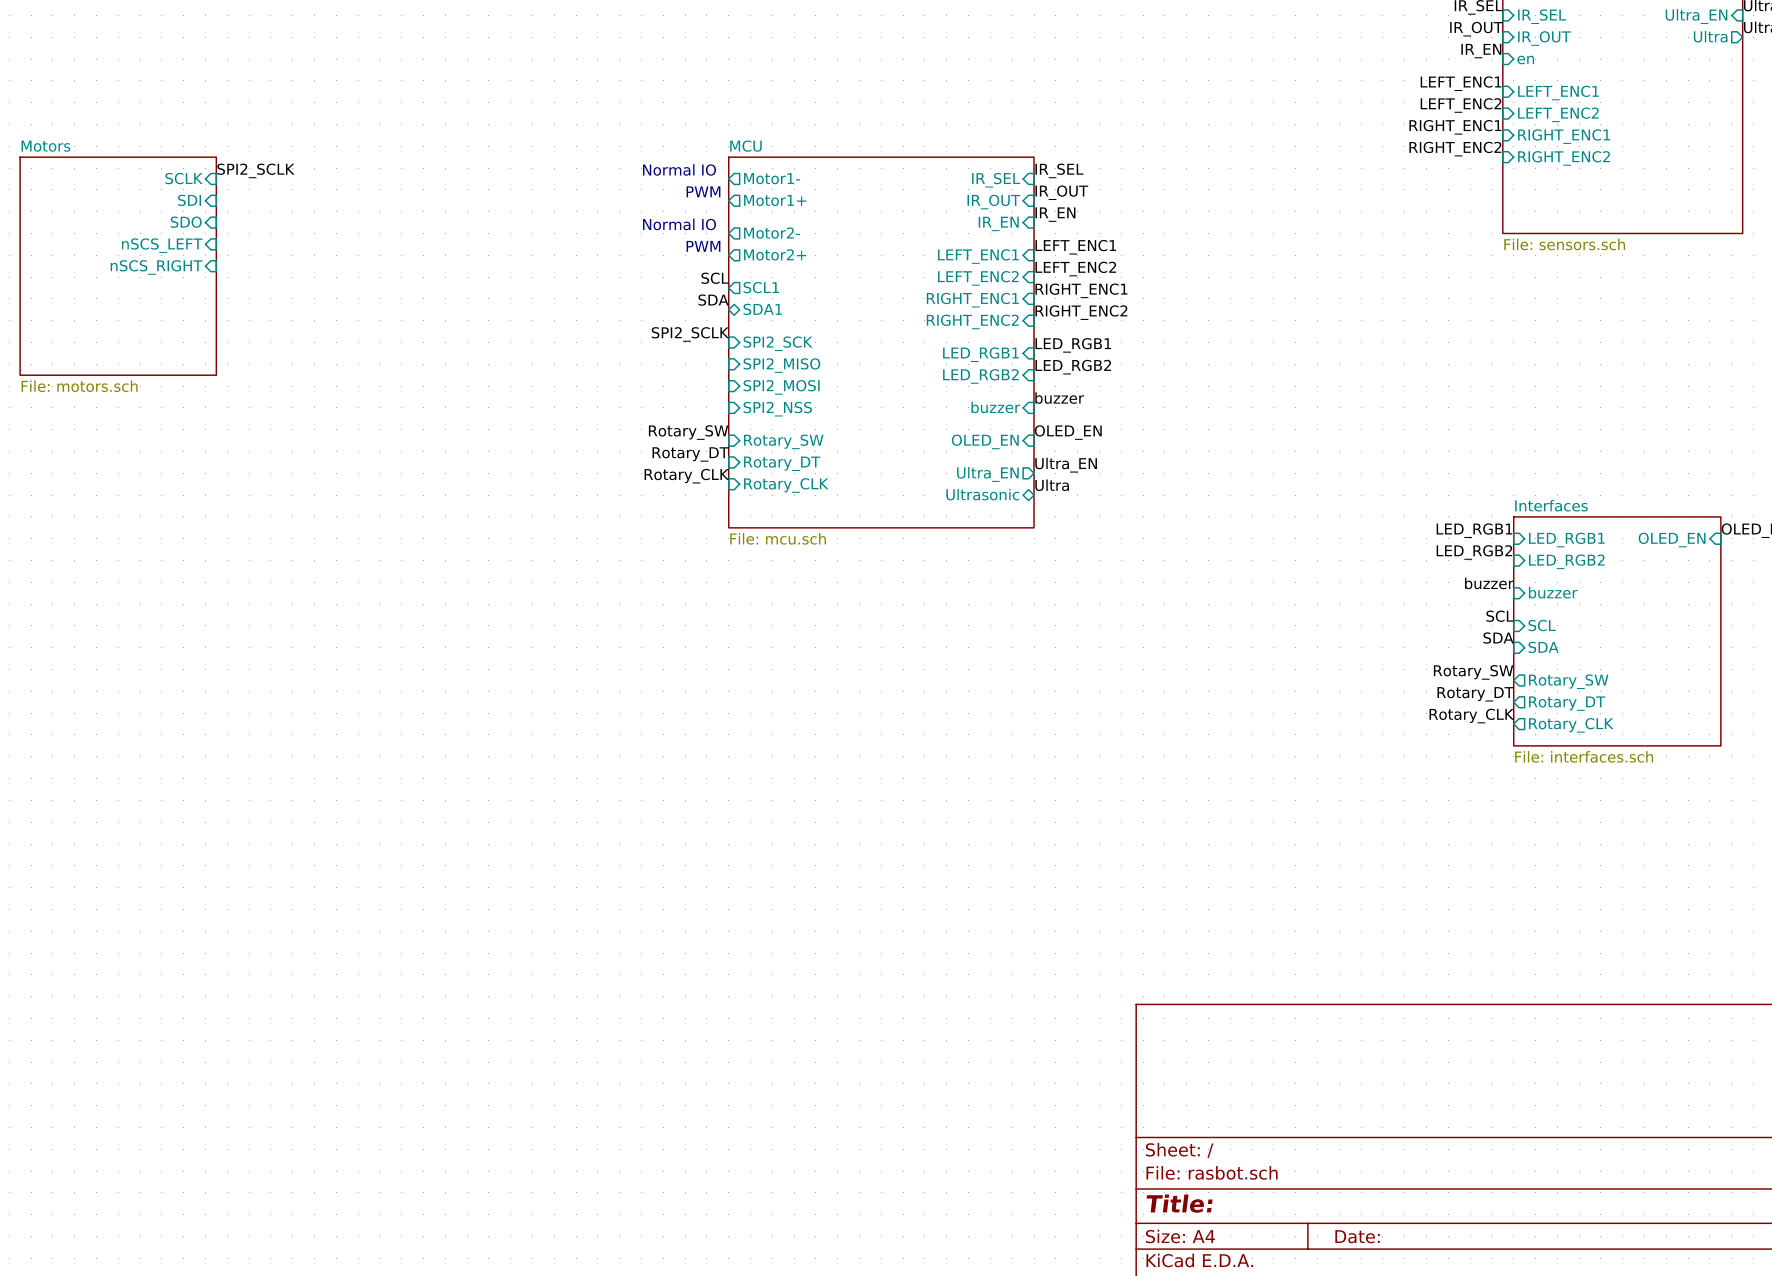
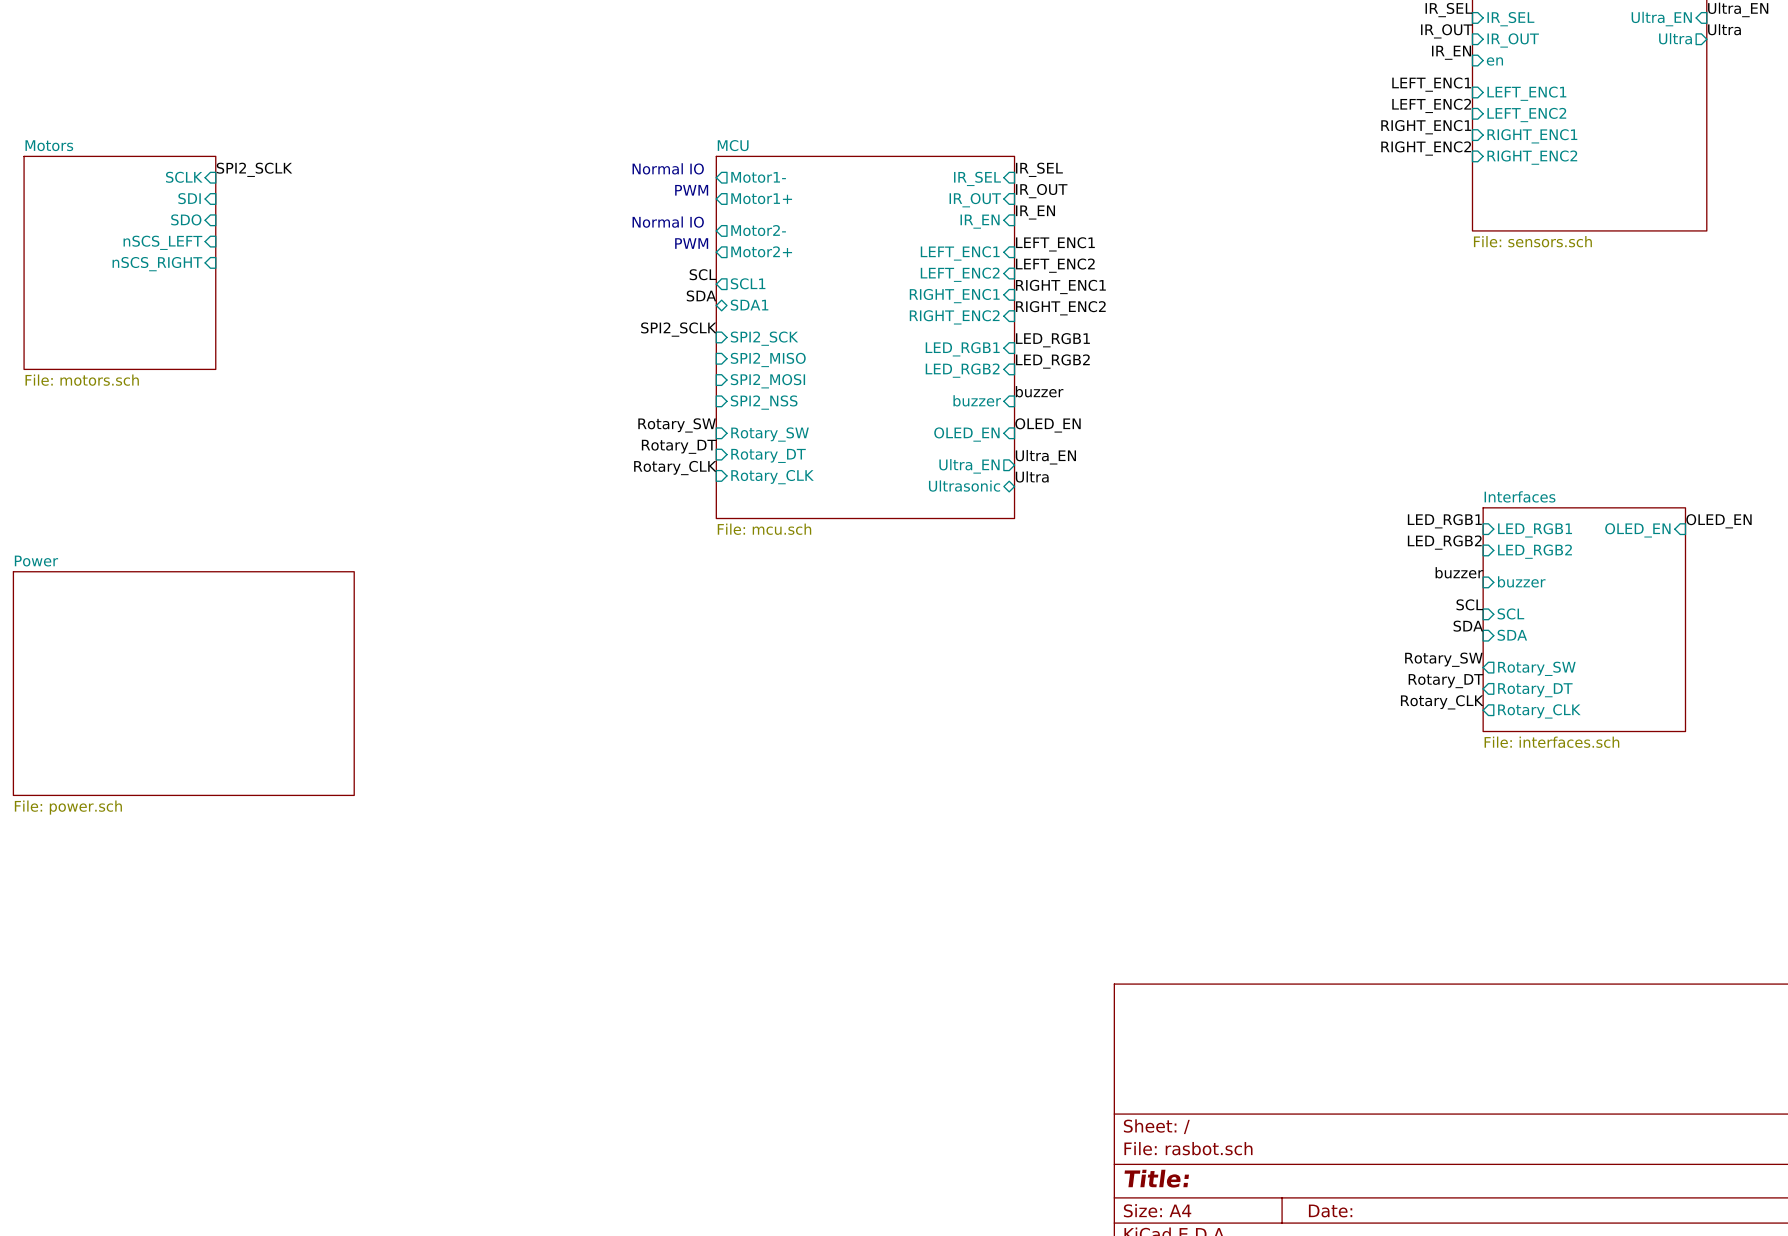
sheet Power: none -> File: power.sch (183, 683)

